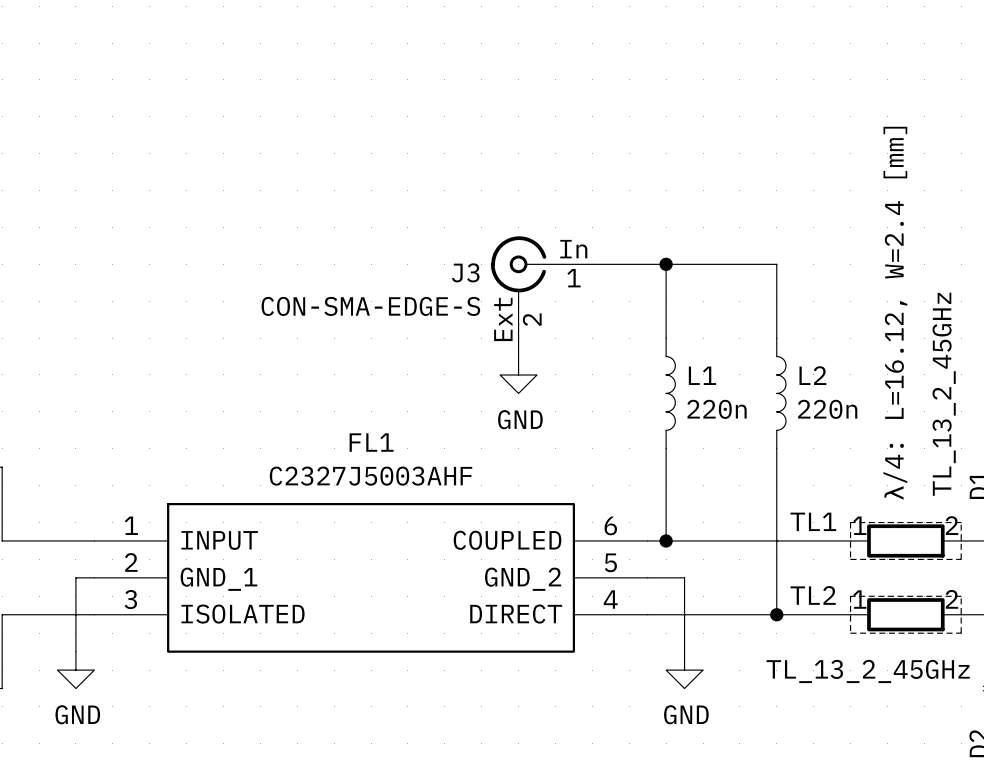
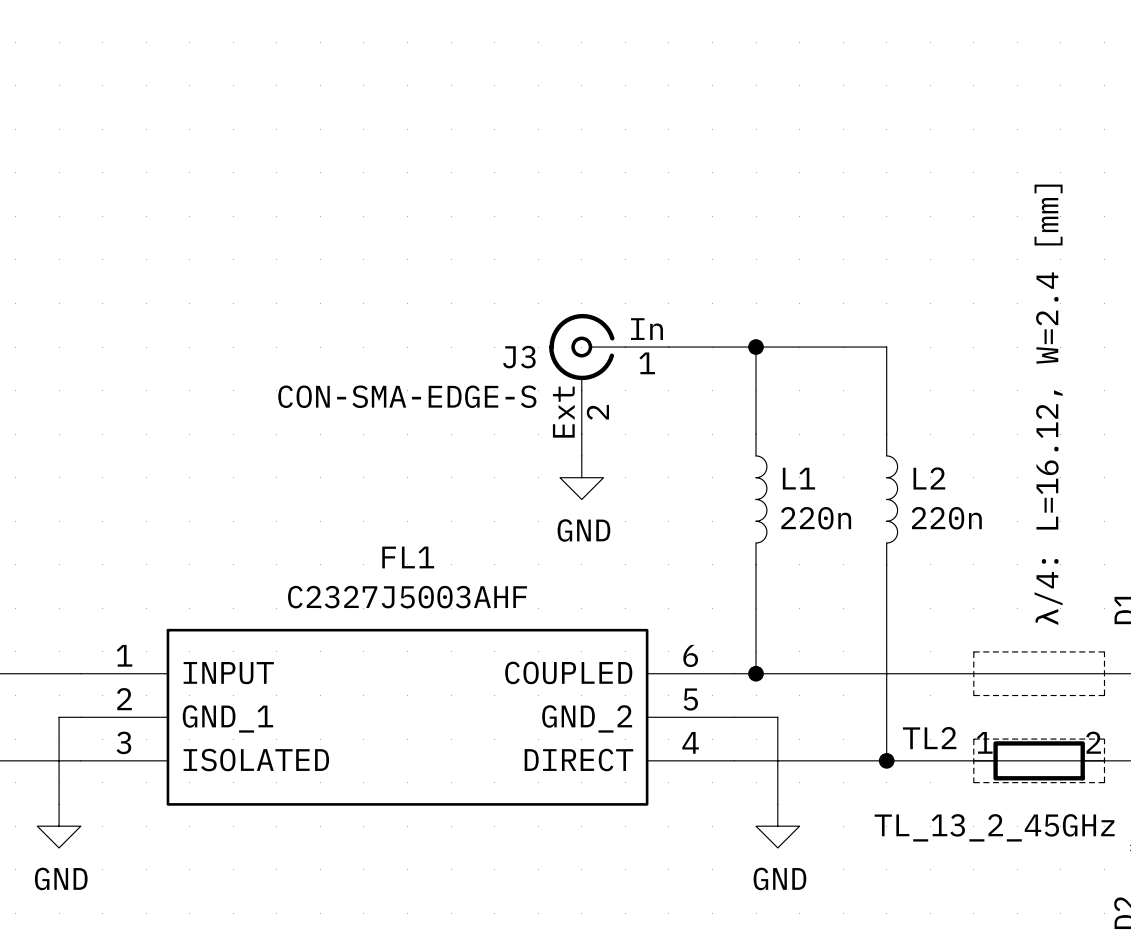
text position: λ/4: L=16.12, W=2.4 [mm] (895, 313) -> λ/4: L=16.12, W=2.4 [mm] (1048, 404)
wire: none -> (973, 673) (1104, 673)
TL1: TL_13_2_45GHz (905, 540) -> none
wire: none -> (973, 760) (1104, 760)

